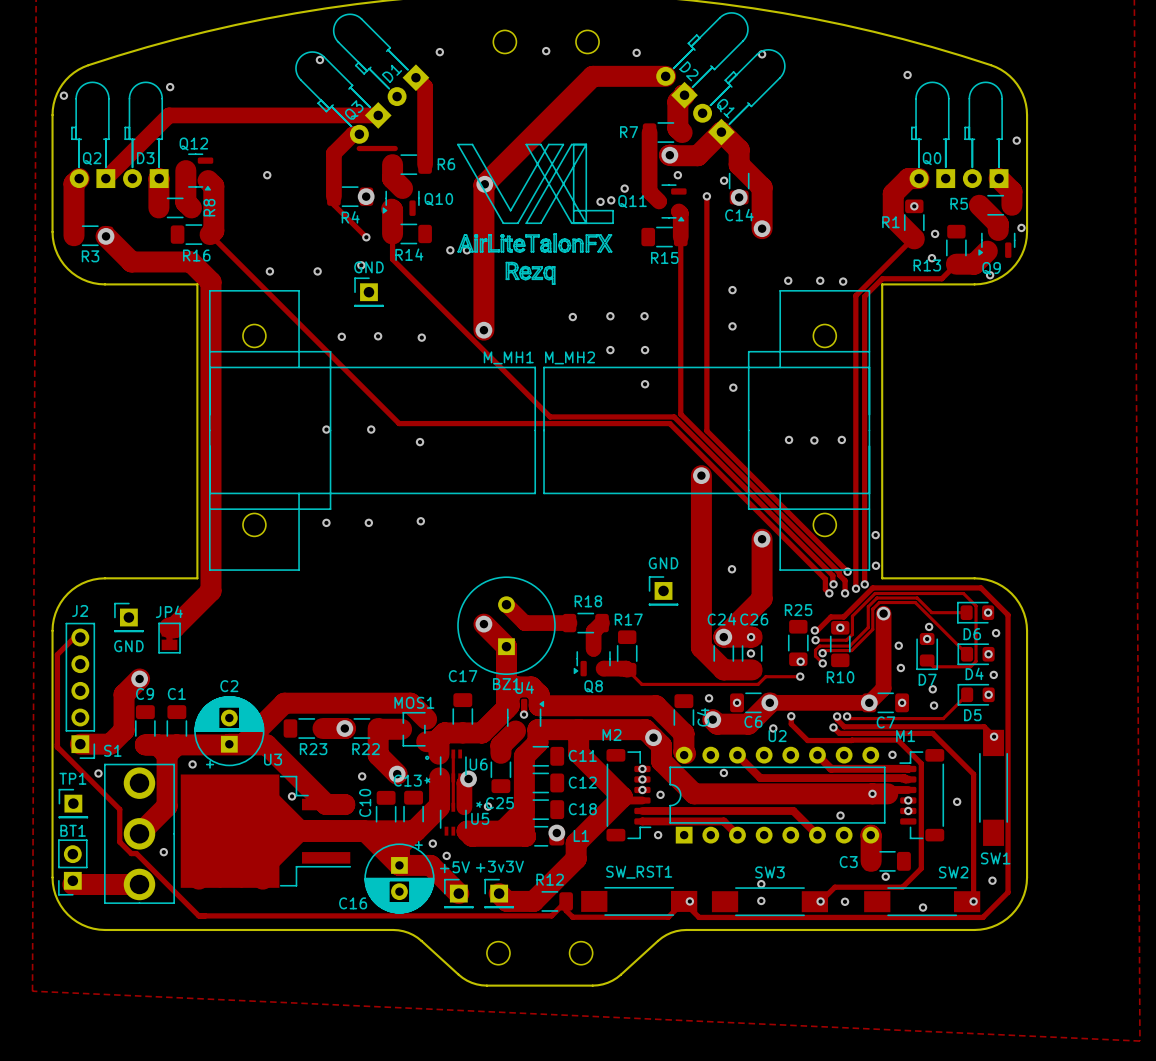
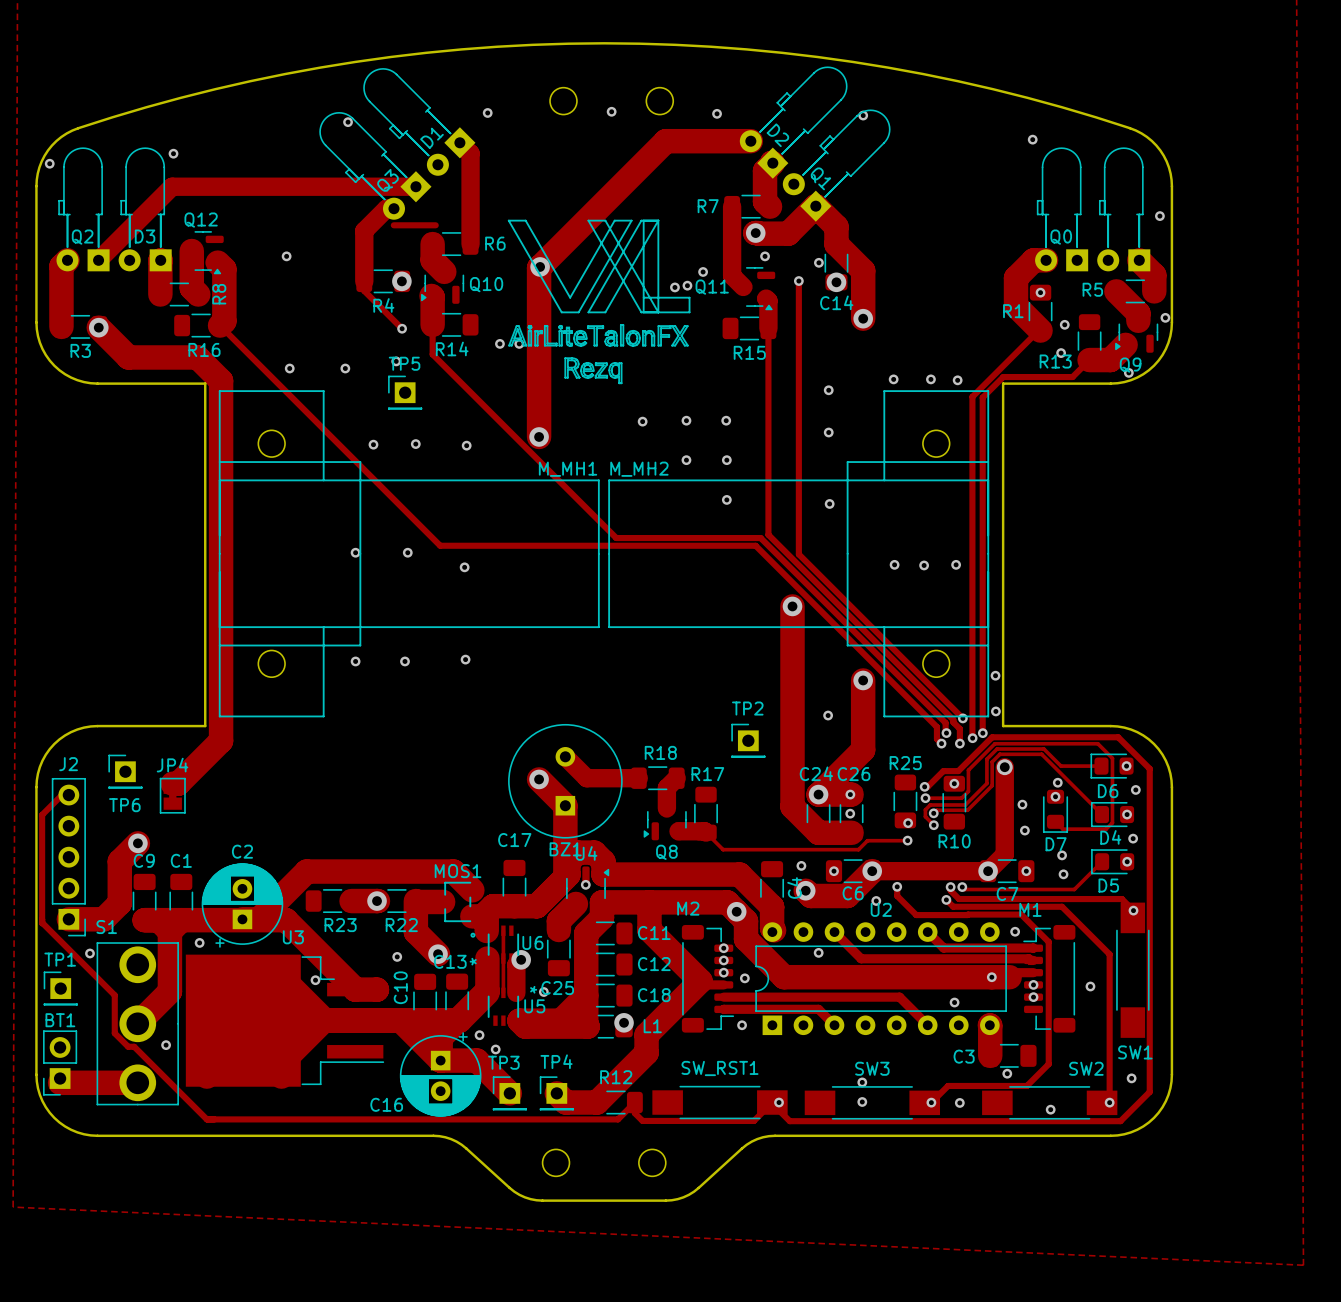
GND name: GND (368, 267) -> TP5 (404, 363)
GND name: GND (663, 563) -> TP2 (747, 708)
GND name: GND (128, 646) -> TP6 (124, 805)
+3v3V name: +3v3V (499, 866) -> TP4 (556, 1061)
+5V name: +5V (454, 867) -> TP3 (503, 1062)

